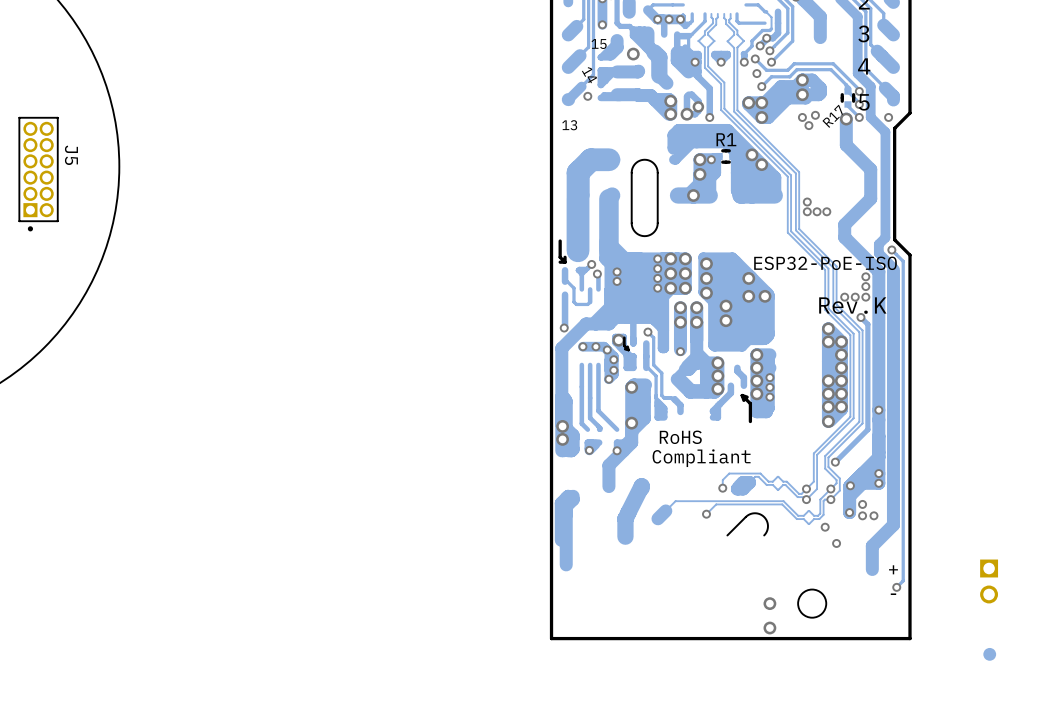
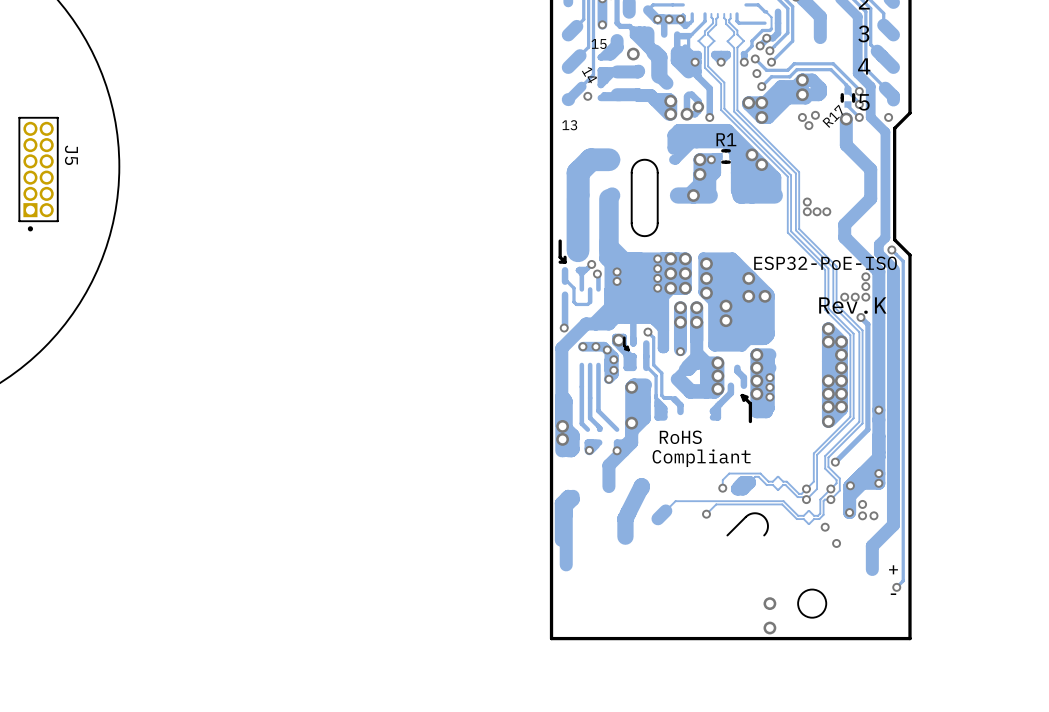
part: (989, 581) -> none
part: (989, 654) -> none

